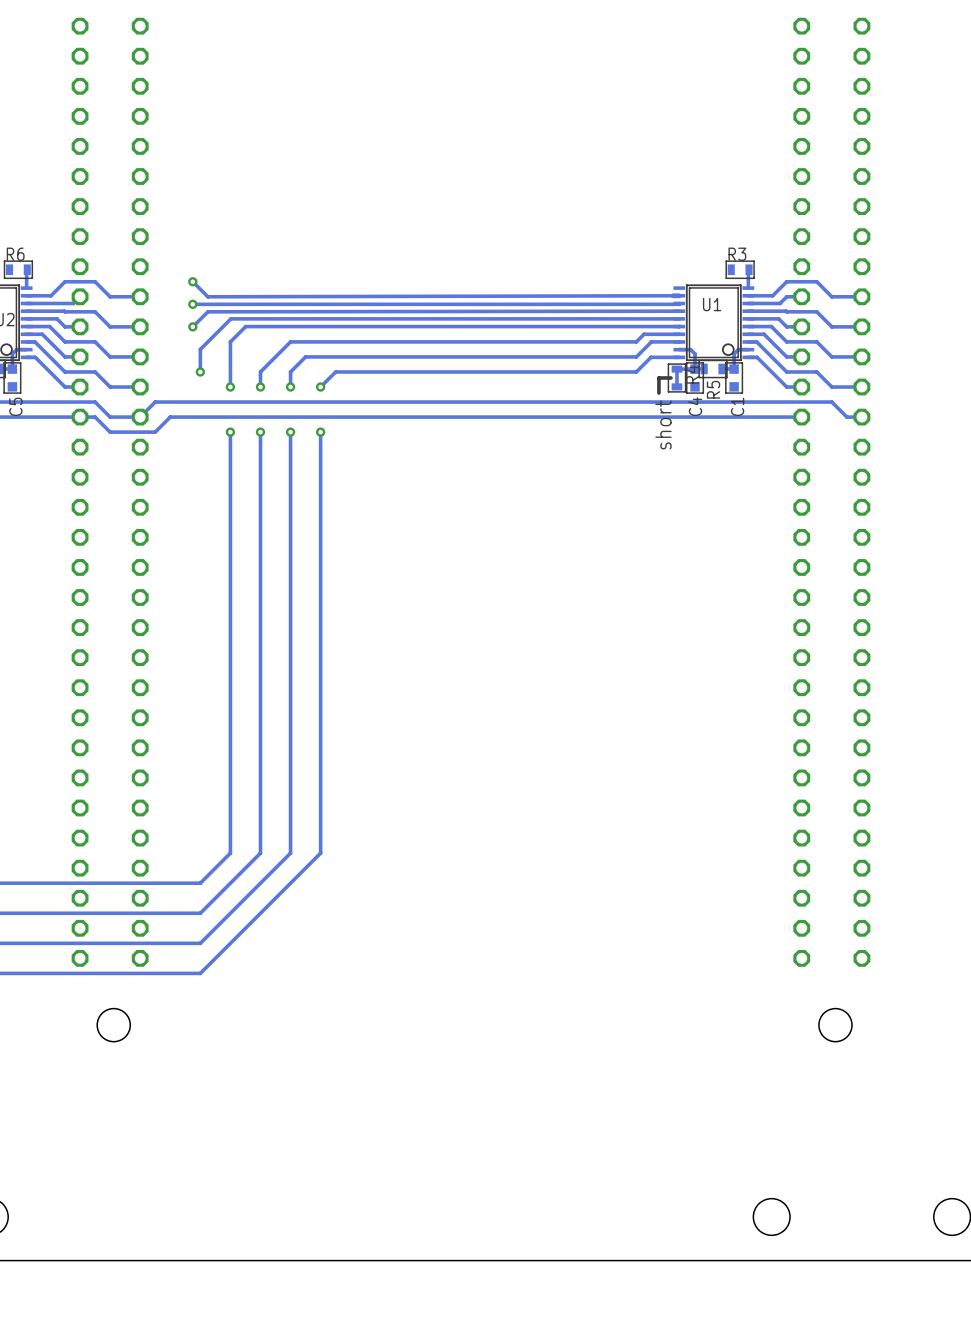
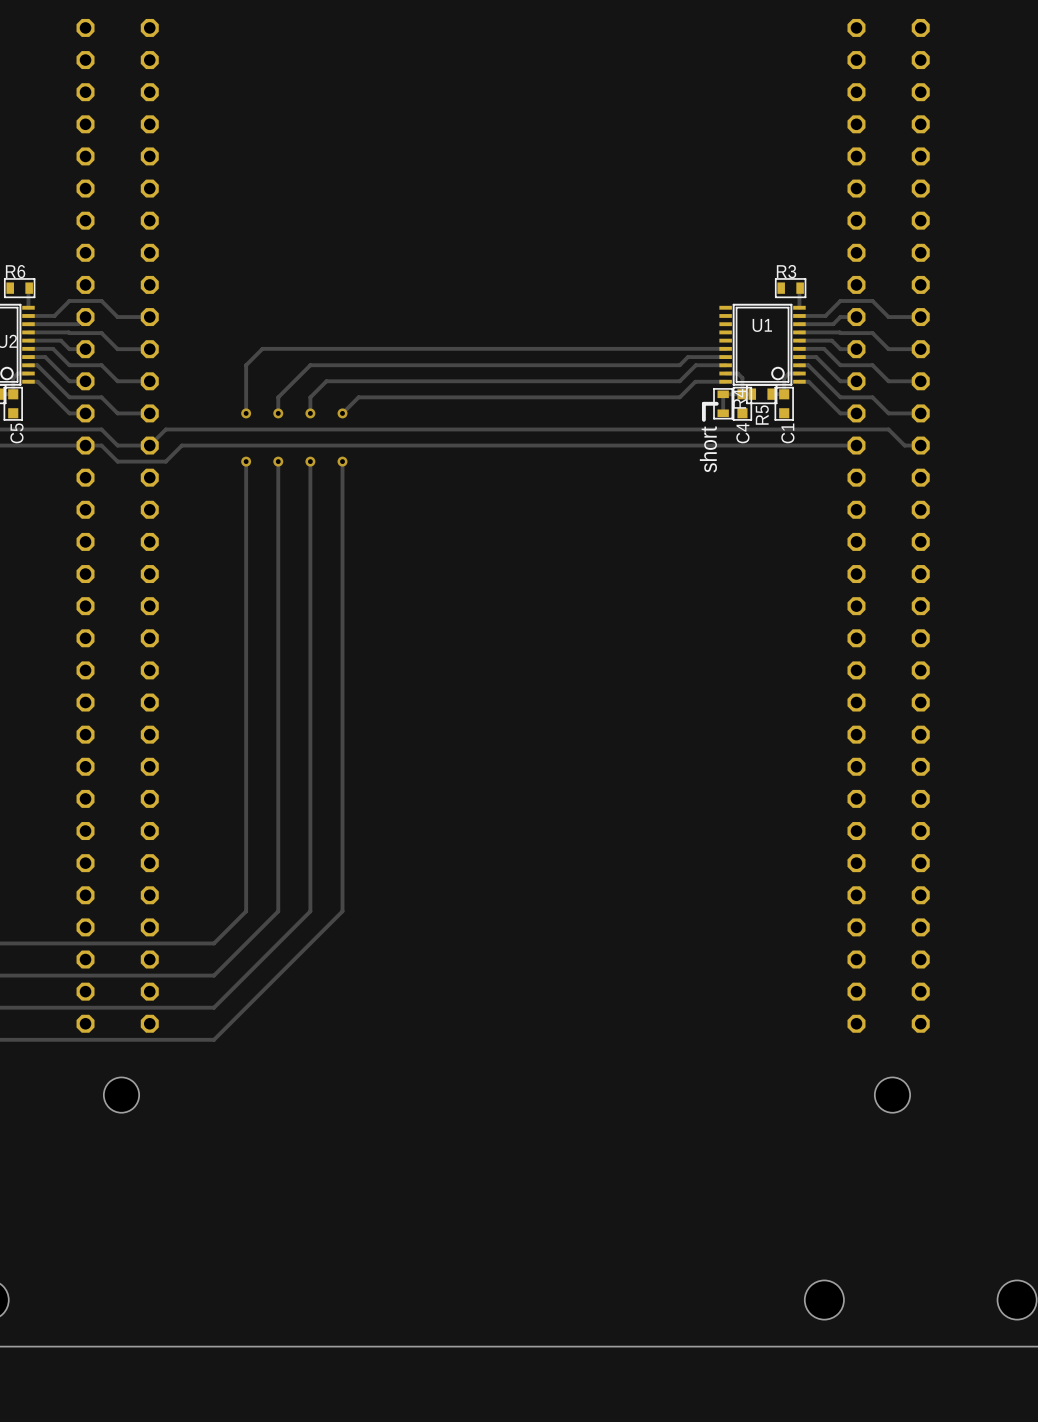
track: (192, 281) (207, 296) (679, 295) -> none
via: (192, 281) -> none
track: (679, 303) (192, 304) -> none
via: (192, 304) -> none
track: (679, 311) (207, 311) (192, 326) -> none
track: (679, 318) (230, 318) (200, 349) (200, 371) -> none
via: (192, 326) -> none
via: (200, 371) -> none

